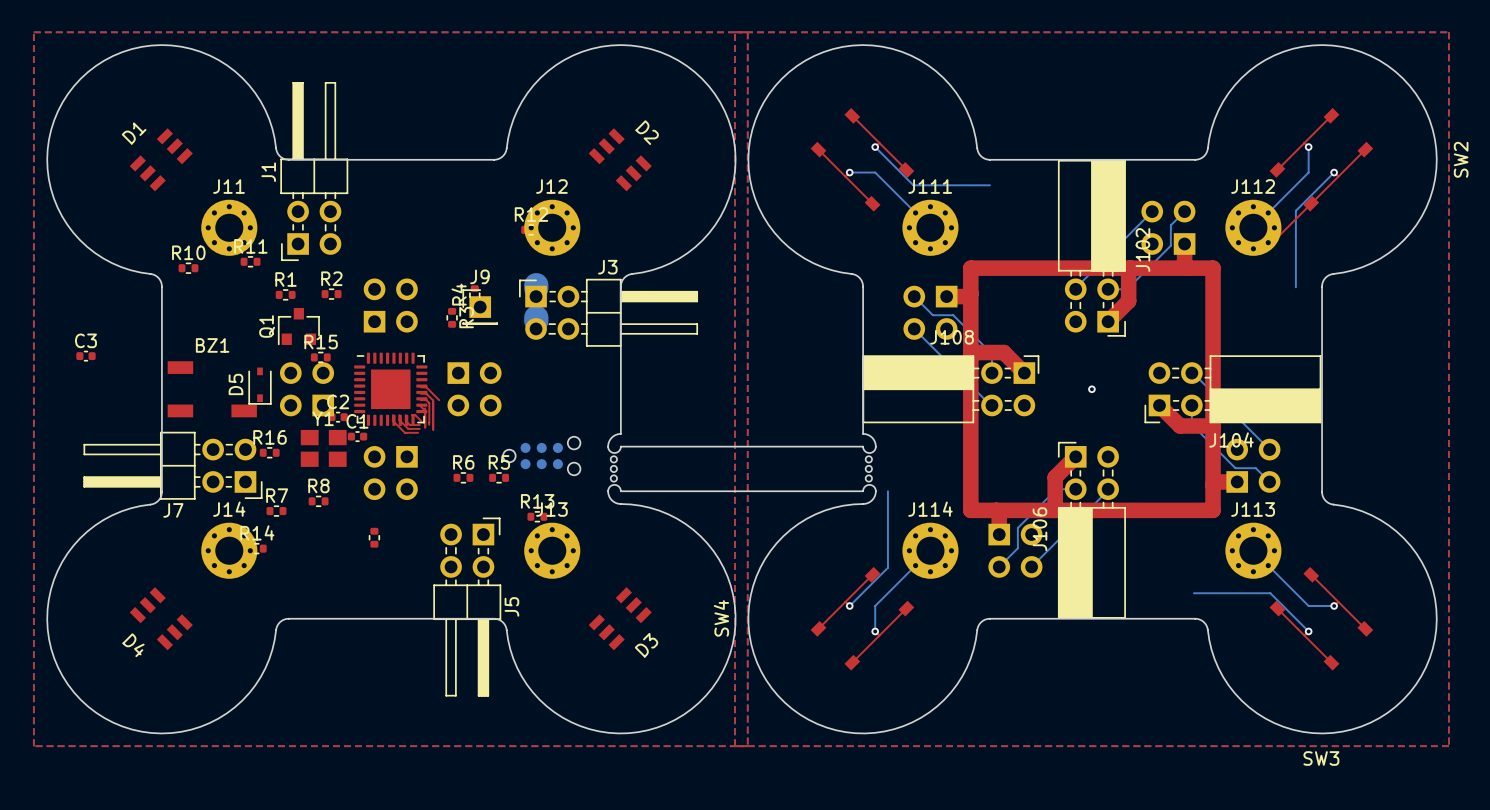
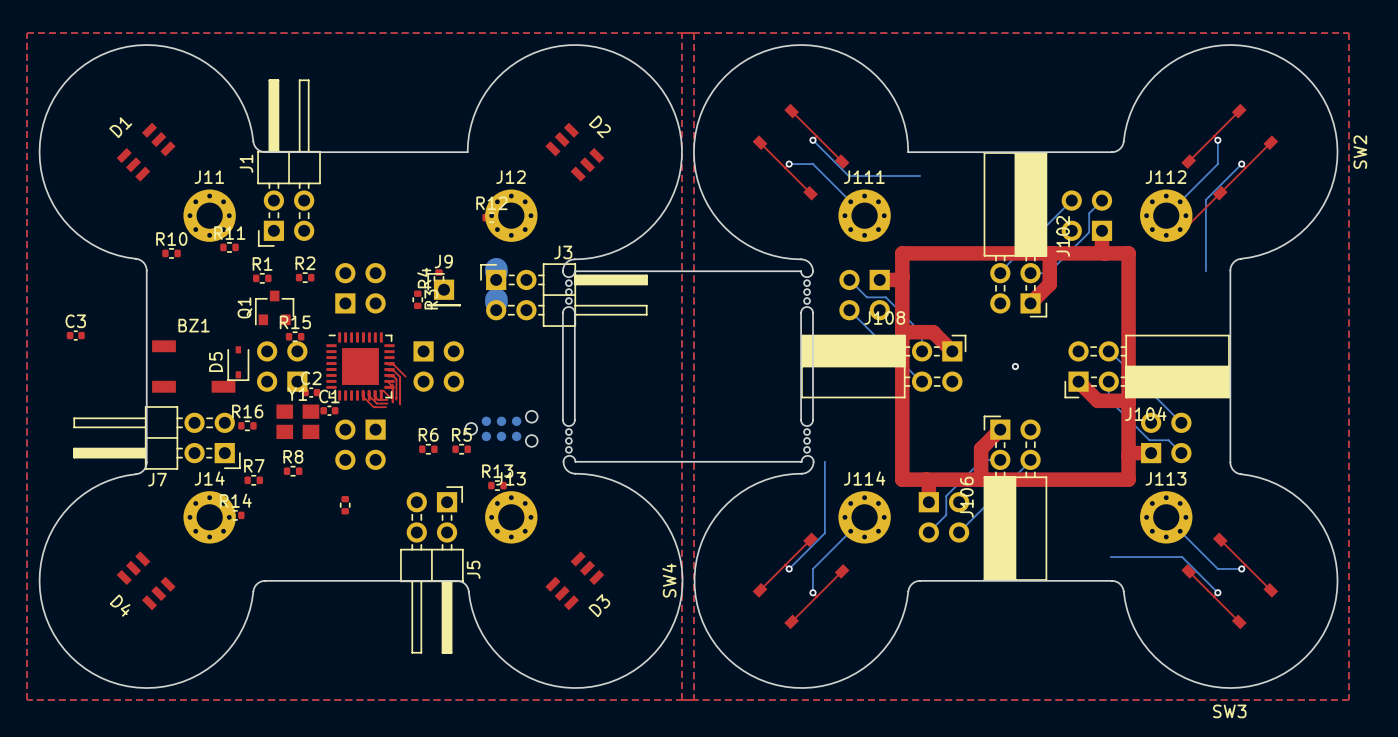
board edge: (494, 159) (501, 157) (505, 152) (510, 128) (517, 110) (527, 93) (540, 77) (564, 60) (582, 51) (601, 46) (621, 45) (641, 46) (660, 52) (678, 60) (694, 71) (708, 86) (720, 102) (728, 120) (735, 149) (735, 169) (728, 198) (715, 224) (695, 246) (679, 258) (651, 270) (629, 274) (621, 282) (620, 433) (611, 437) (608, 446) (610, 451) (614, 453) (619, 451) (620, 446) (863, 446) (864, 451) (869, 453) (875, 449) (873, 438) (863, 433) (861, 280) (854, 274) (832, 270) (813, 263) (788, 246) (768, 224) (758, 207) (752, 188) (748, 159) (752, 129) (763, 102) (775, 86) (789, 71) (814, 55) (842, 46) (862, 45) (882, 46) (910, 55) (936, 71) (956, 93) (970, 119) (978, 152) (983, 158) (989, 159) -> (456, 152) (467, 152) (469, 134) (473, 116) (481, 100) (491, 85) (510, 66) (525, 56) (542, 50) (559, 46) (577, 45) (604, 49) (621, 55) (636, 64) (656, 83) (671, 105) (679, 131) (681, 158) (679, 176) (673, 193) (660, 216) (641, 235) (626, 245) (610, 253) (568, 260) (564, 265) (562, 271) (564, 275) (568, 277) (573, 275) (574, 271) (801, 271) (805, 277) (811, 274) (812, 268) (807, 260) (764, 252) (747, 244) (732, 234) (718, 221) (708, 205) (700, 188) (695, 170) (693, 152) (695, 133) (700, 115) (708, 98) (718, 83) (732, 70) (747, 59) (764, 51) (791, 45) (819, 46) (837, 51) (862, 64) (883, 83) (898, 106) (906, 133) (908, 152) (920, 152)
part: none -> (568, 292)
part: none -> (807, 292)
board edge: none -> (562, 312) (562, 420) (564, 424) (568, 426) (573, 424) (574, 420) (574, 312) (573, 308) (568, 306) (564, 308) (562, 312)
board edge: none -> (801, 312) (801, 420) (802, 424) (807, 426) (811, 424) (812, 420) (812, 312) (811, 308) (807, 306) (802, 308) (801, 312)

